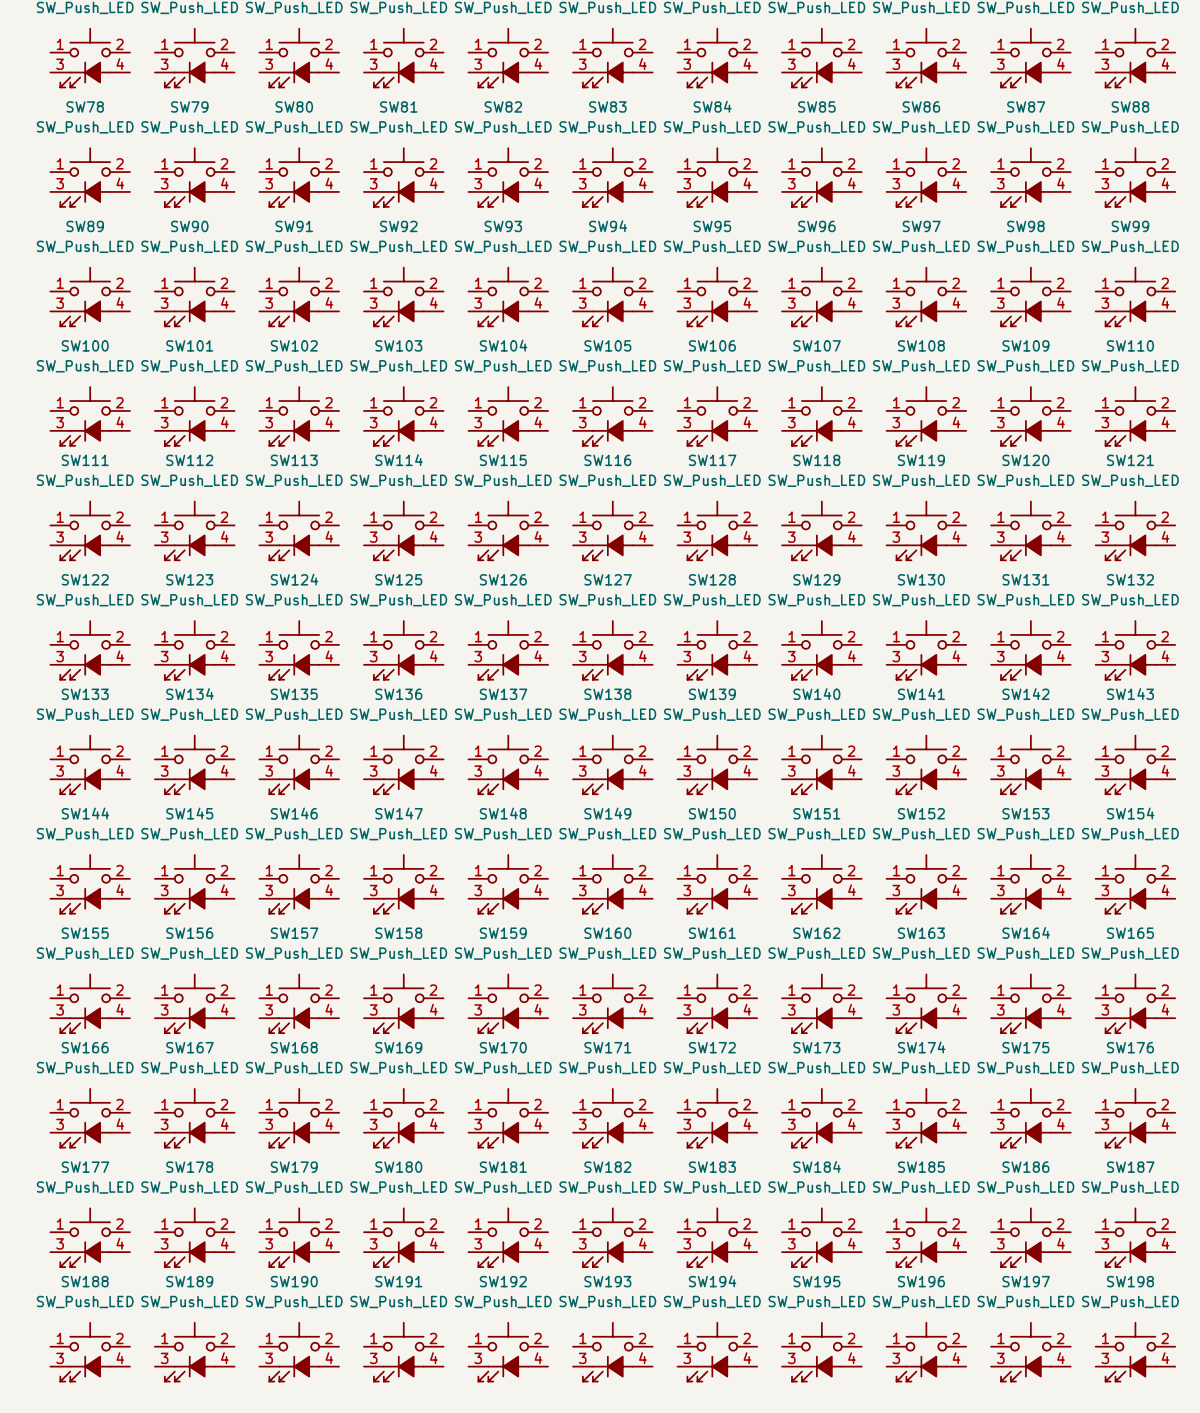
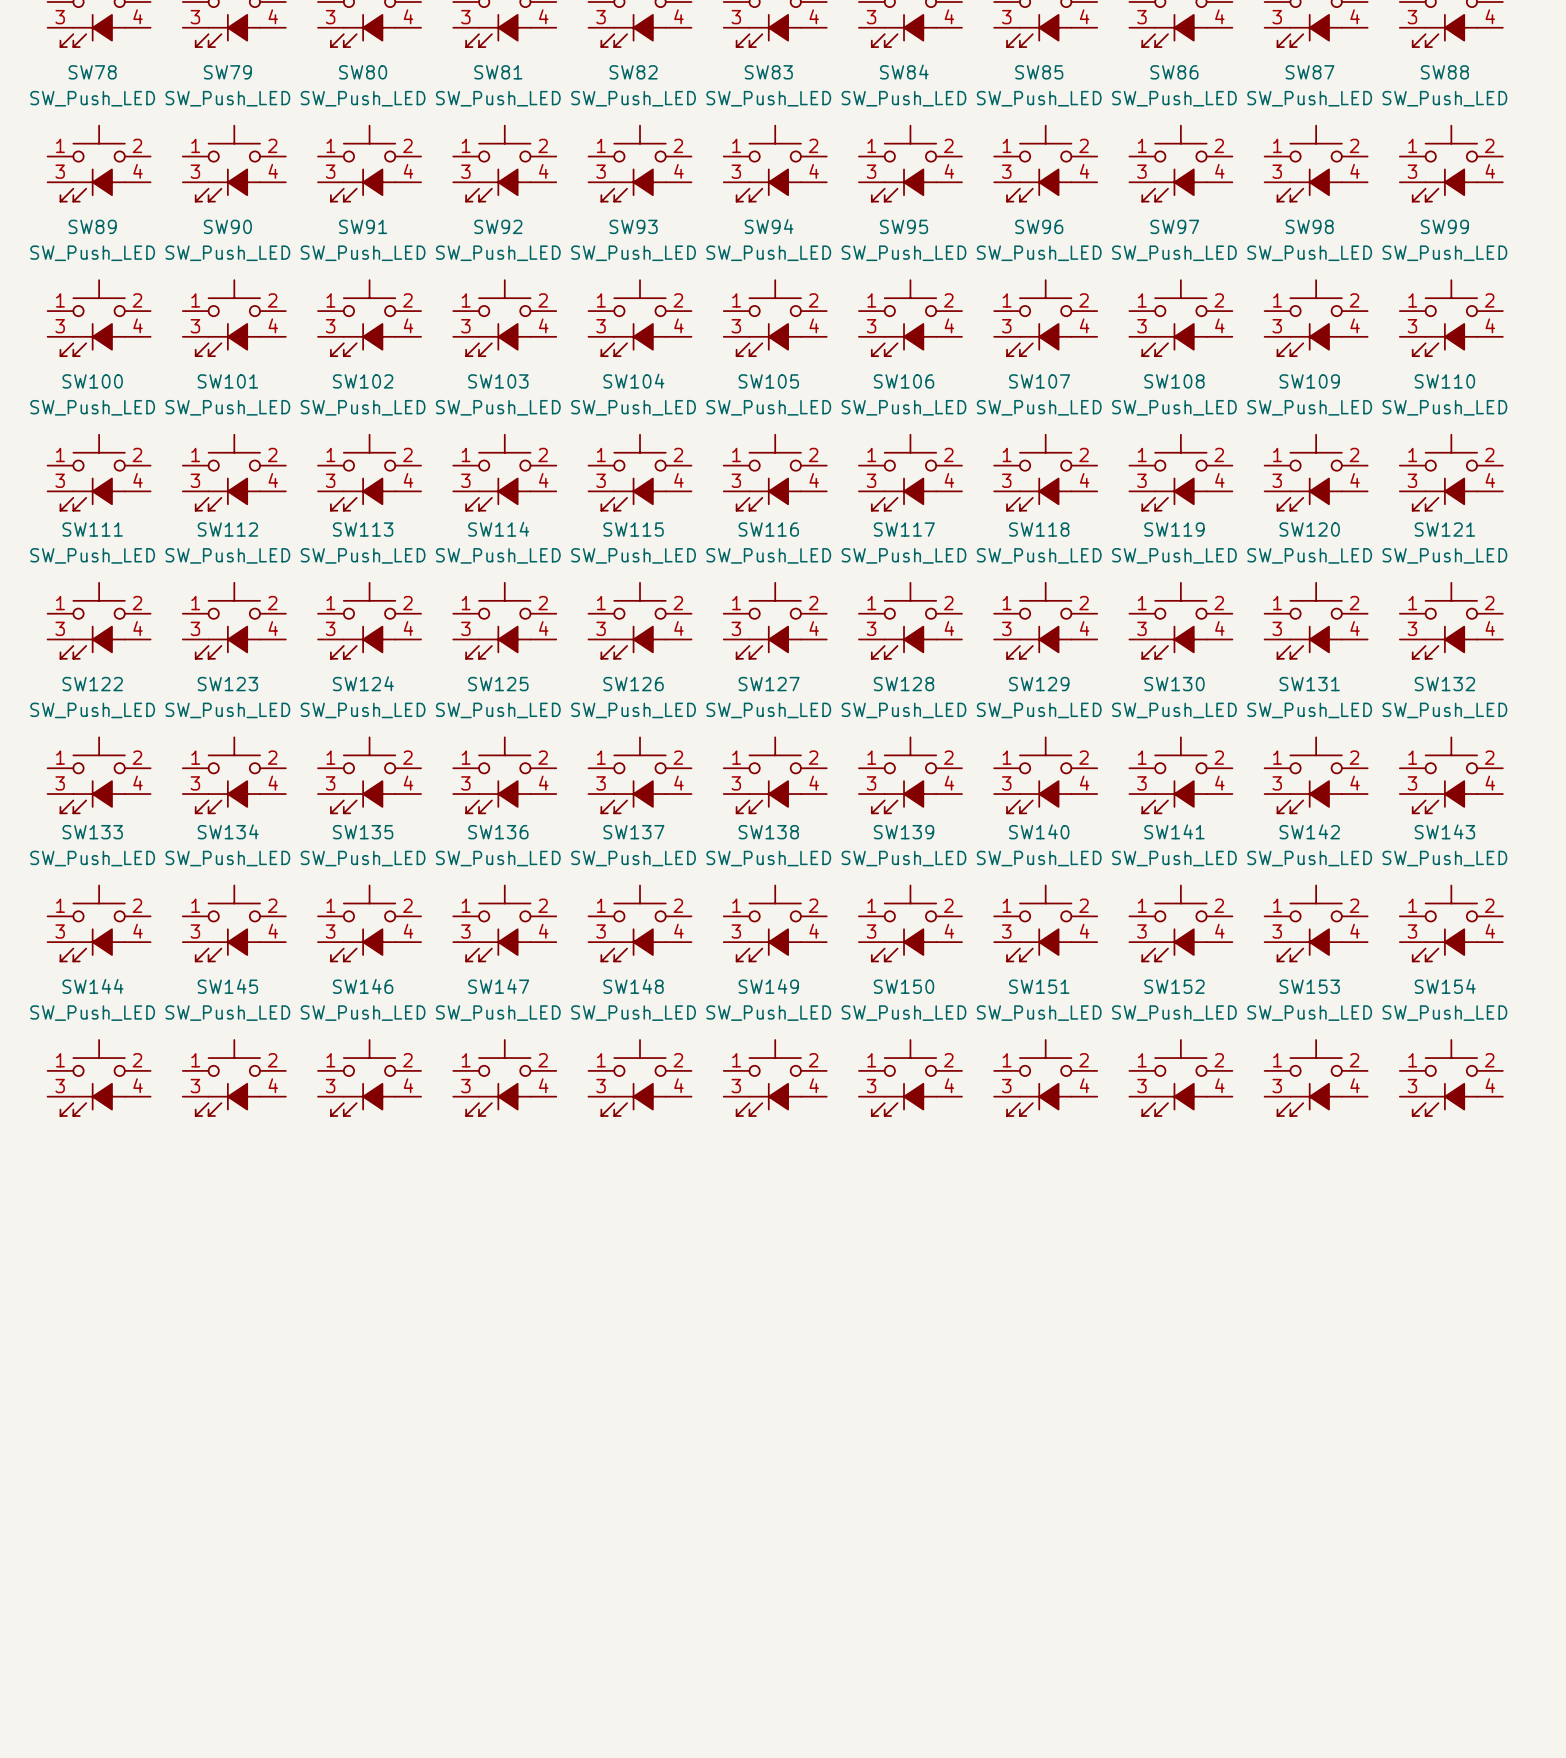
SW155: SW_Push_LED (90, 1003) -> none
SW156: SW_Push_LED (194, 1003) -> none
SW157: SW_Push_LED (299, 1003) -> none
SW158: SW_Push_LED (403, 1003) -> none
SW159: SW_Push_LED (508, 1003) -> none
SW160: SW_Push_LED (612, 1003) -> none
SW161: SW_Push_LED (717, 1003) -> none
SW162: SW_Push_LED (821, 1003) -> none
SW163: SW_Push_LED (926, 1003) -> none
SW164: SW_Push_LED (1030, 1003) -> none
SW165: SW_Push_LED (1135, 1003) -> none
SW166: SW_Push_LED (90, 1118) -> none
SW167: SW_Push_LED (194, 1118) -> none
SW168: SW_Push_LED (299, 1118) -> none
SW169: SW_Push_LED (403, 1118) -> none
SW170: SW_Push_LED (508, 1118) -> none
SW171: SW_Push_LED (612, 1118) -> none
SW172: SW_Push_LED (717, 1118) -> none
SW173: SW_Push_LED (821, 1118) -> none
SW174: SW_Push_LED (926, 1118) -> none
SW175: SW_Push_LED (1030, 1118) -> none
SW176: SW_Push_LED (1135, 1118) -> none
SW177: SW_Push_LED (90, 1237) -> none
SW178: SW_Push_LED (194, 1237) -> none
SW179: SW_Push_LED (299, 1237) -> none
SW180: SW_Push_LED (403, 1237) -> none
SW181: SW_Push_LED (508, 1237) -> none
SW182: SW_Push_LED (612, 1237) -> none
SW183: SW_Push_LED (717, 1237) -> none
SW184: SW_Push_LED (821, 1237) -> none
SW185: SW_Push_LED (926, 1237) -> none
SW186: SW_Push_LED (1030, 1237) -> none
SW187: SW_Push_LED (1135, 1237) -> none
SW188: SW_Push_LED (90, 1352) -> none
SW189: SW_Push_LED (194, 1352) -> none
SW190: SW_Push_LED (299, 1352) -> none
SW191: SW_Push_LED (403, 1352) -> none
SW192: SW_Push_LED (508, 1352) -> none
SW193: SW_Push_LED (612, 1352) -> none
SW194: SW_Push_LED (717, 1352) -> none
SW195: SW_Push_LED (821, 1352) -> none
SW196: SW_Push_LED (926, 1352) -> none
SW197: SW_Push_LED (1030, 1352) -> none
SW198: SW_Push_LED (1135, 1352) -> none

